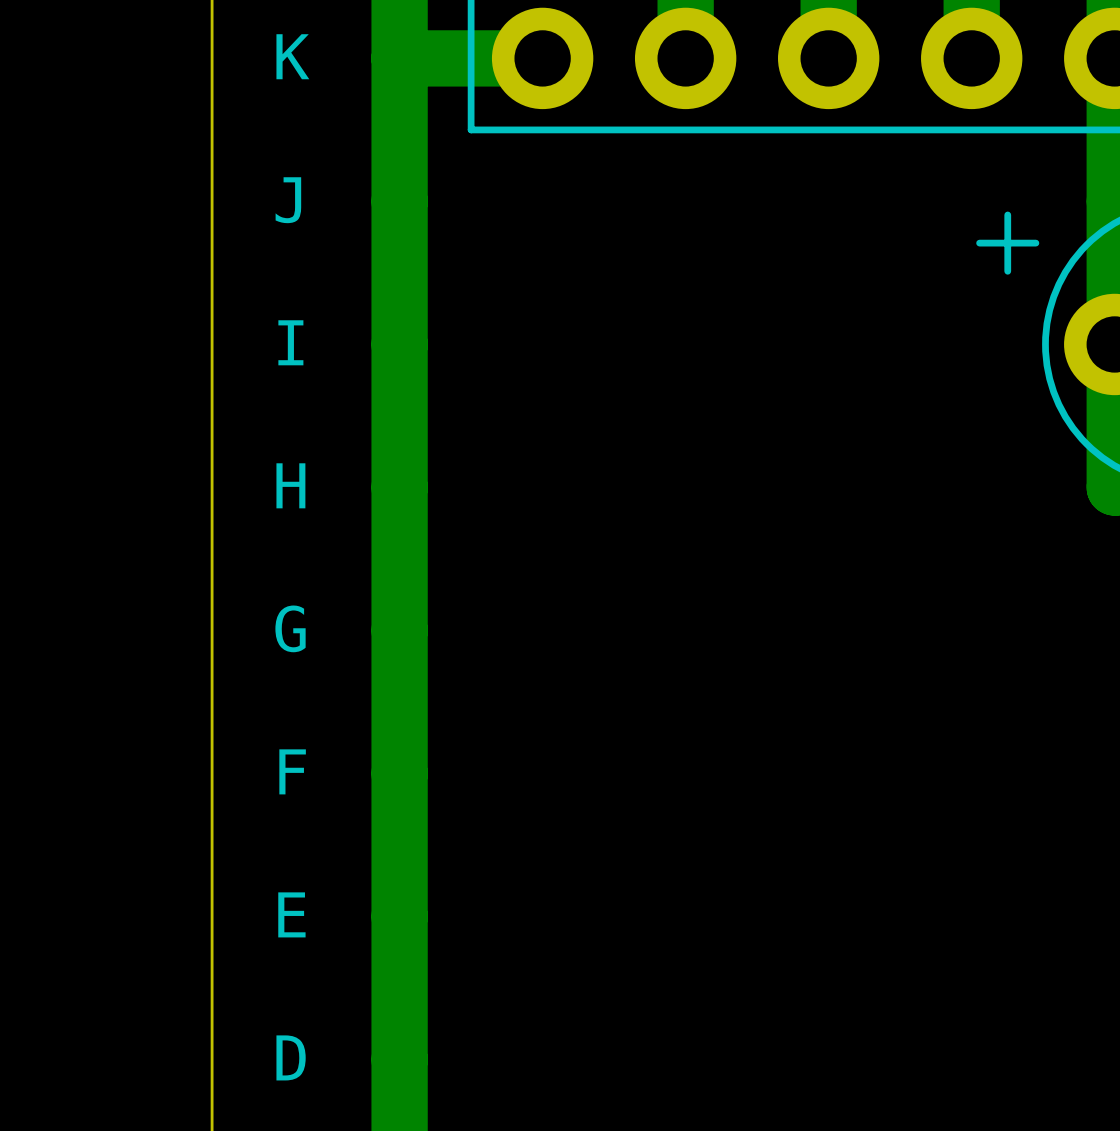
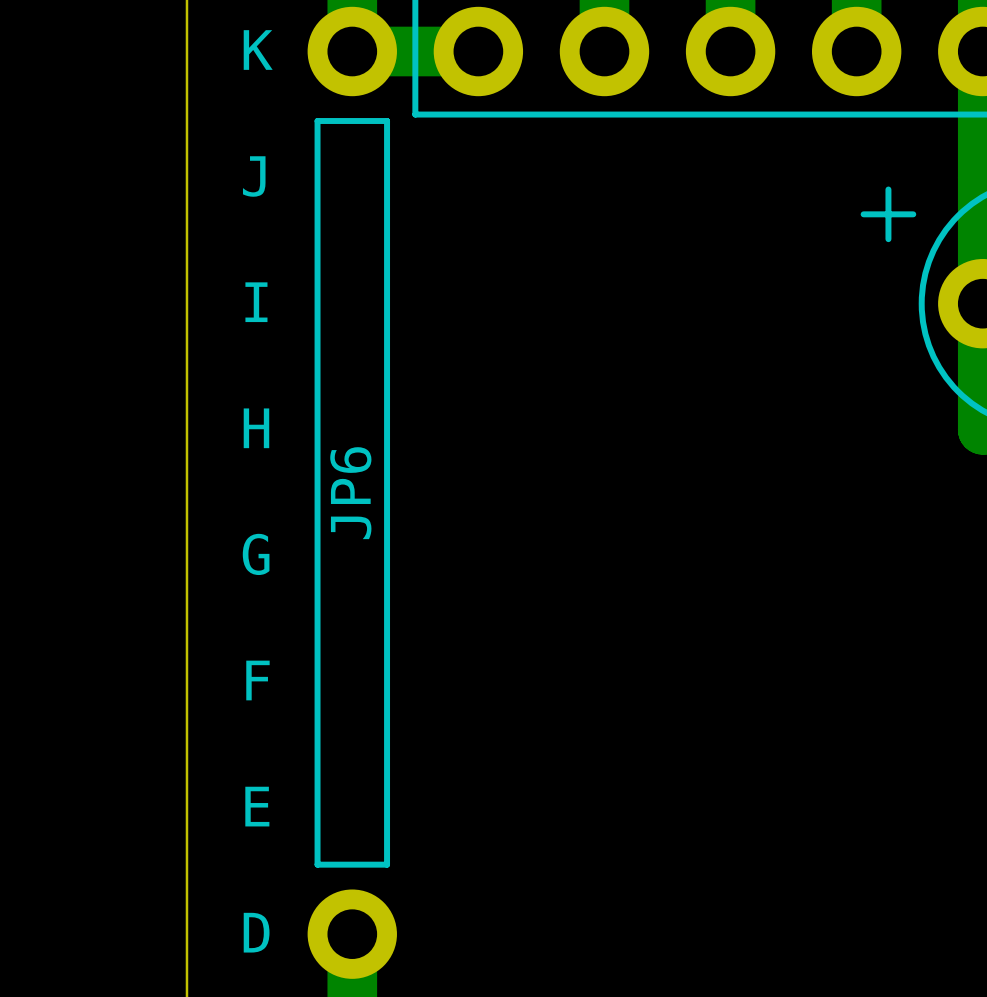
bottom track: (399, 58) (399, 1059) -> none
JP6: none -> (352, 492)

